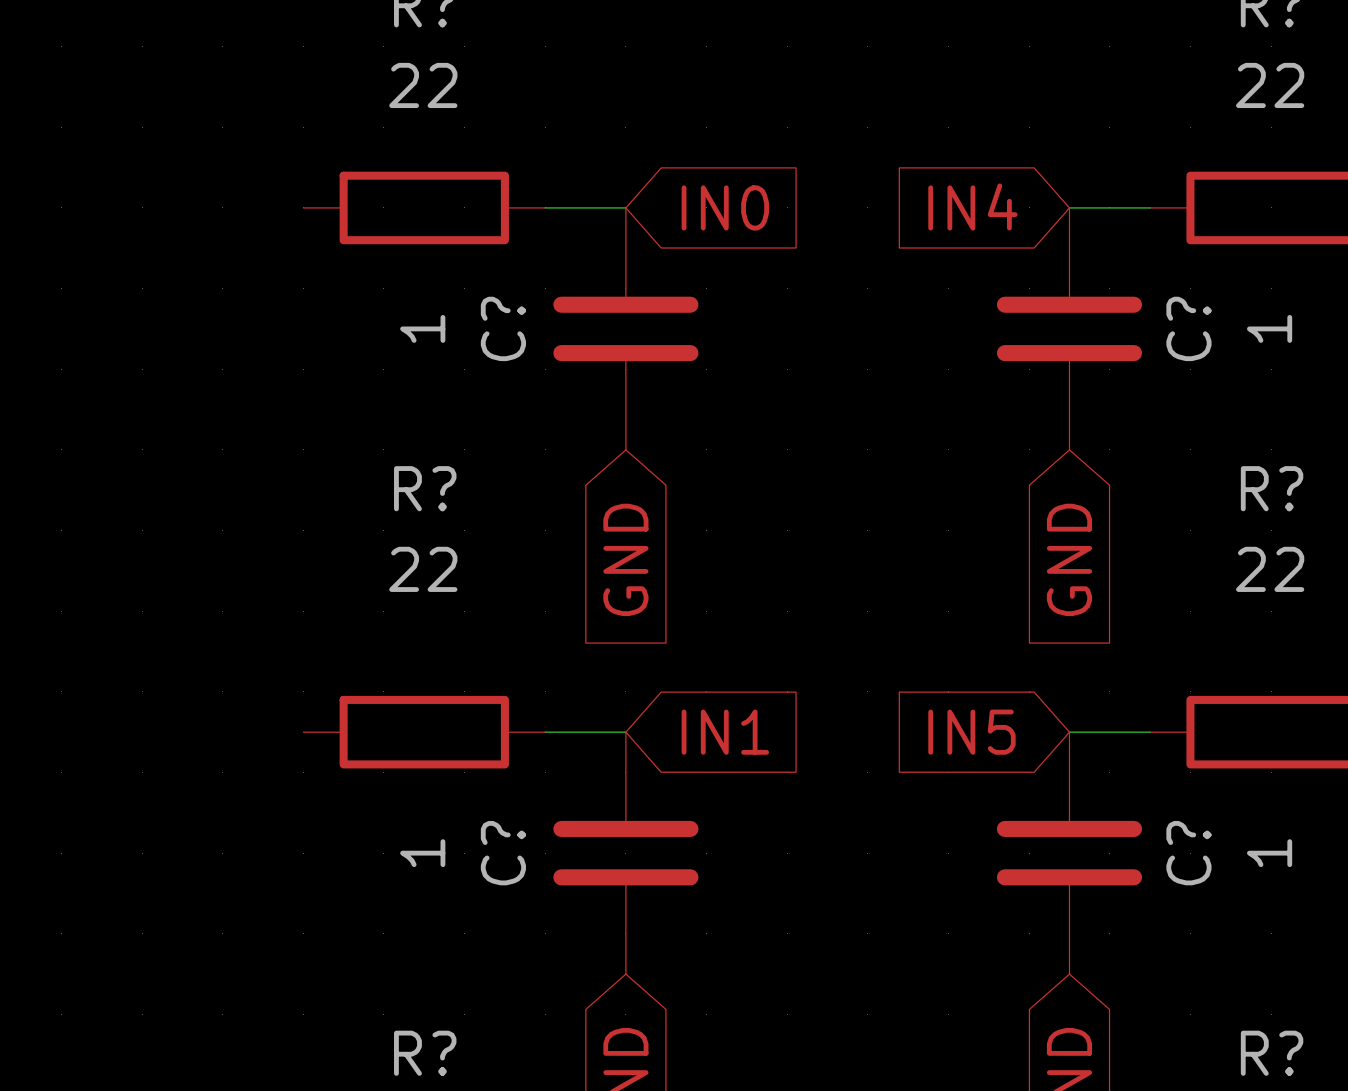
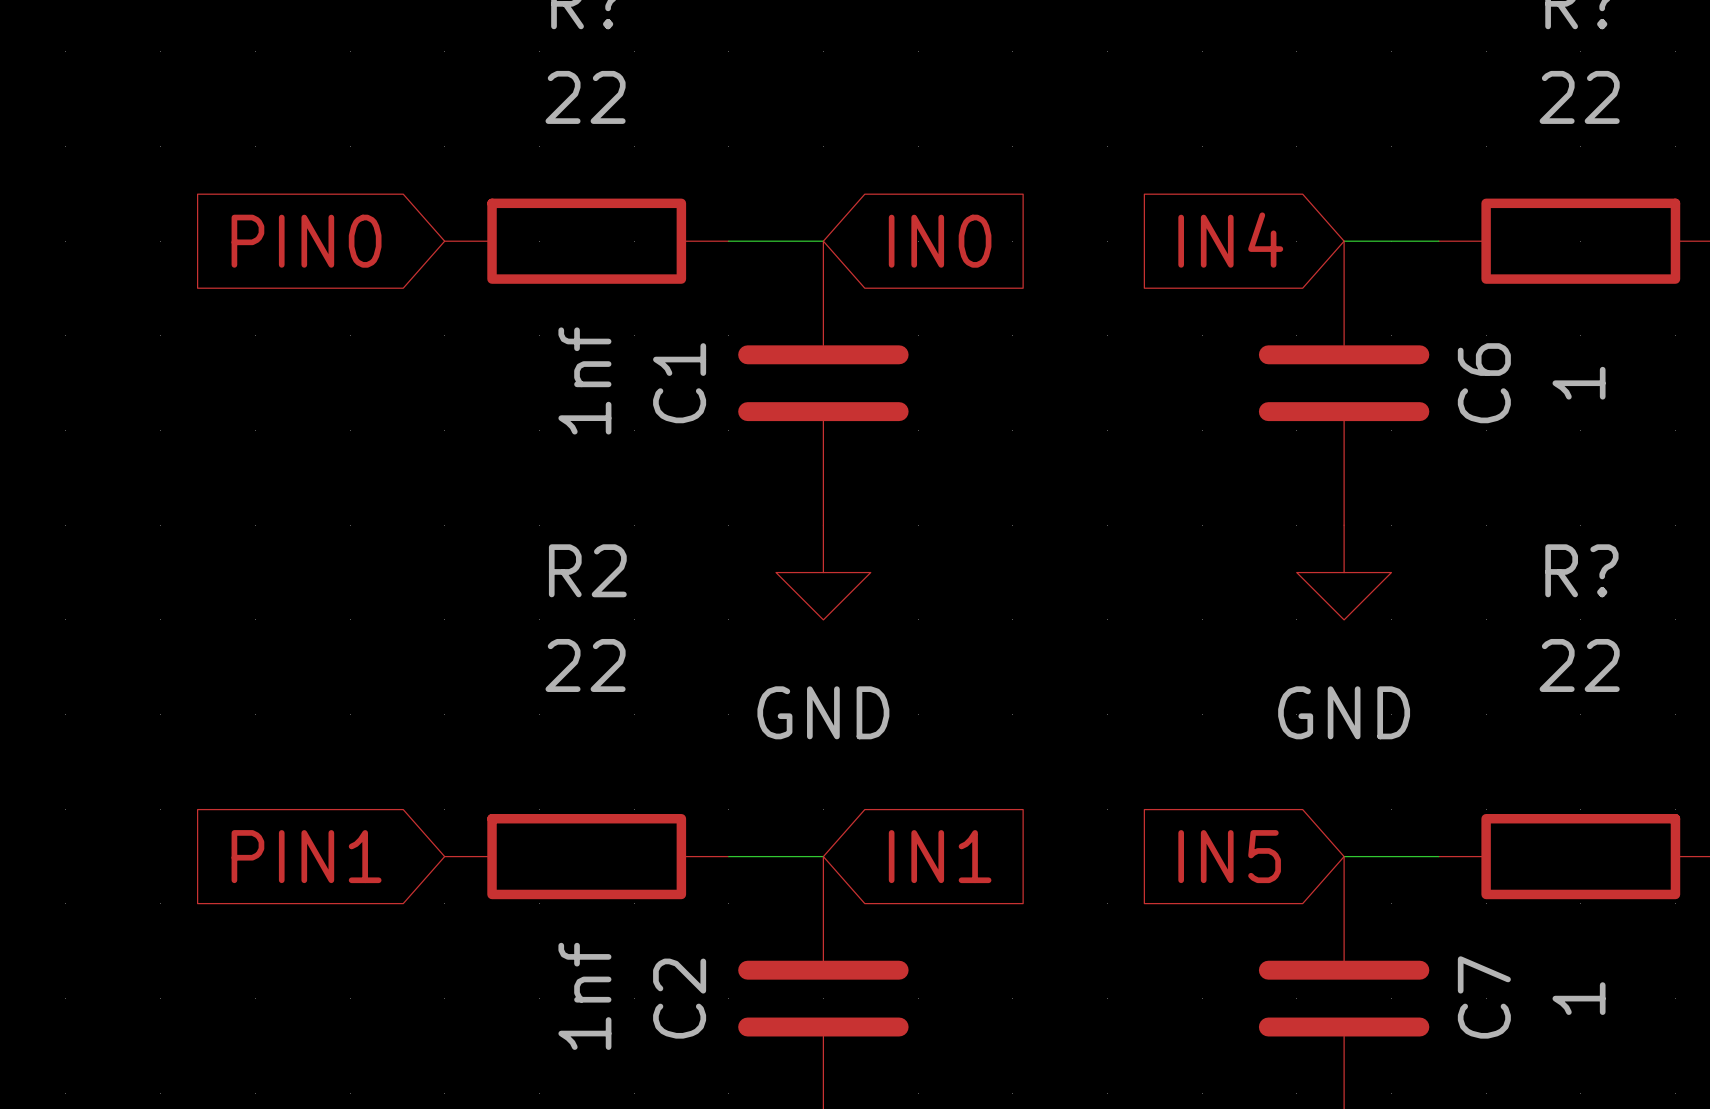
global label: none -> PIN0 (306, 241)
C? value: 1 (422, 328) -> 1nf (584, 380)
C? name: C? (503, 328) -> C1 (679, 383)
C? name: C? (1188, 328) -> C6 (1484, 383)
R? name: R? (425, 488) -> R2 (587, 570)
power symbol: none -> GND (823, 572)
power symbol: none -> GND (1344, 572)
global label: GND (625, 559) -> none
global label: GND (1069, 559) -> none
global label: none -> PIN1 (306, 856)
C? value: 1 (422, 853) -> 1nf (584, 996)
C? name: C? (503, 853) -> C2 (679, 998)
C? name: C? (1188, 853) -> C7 (1484, 997)

